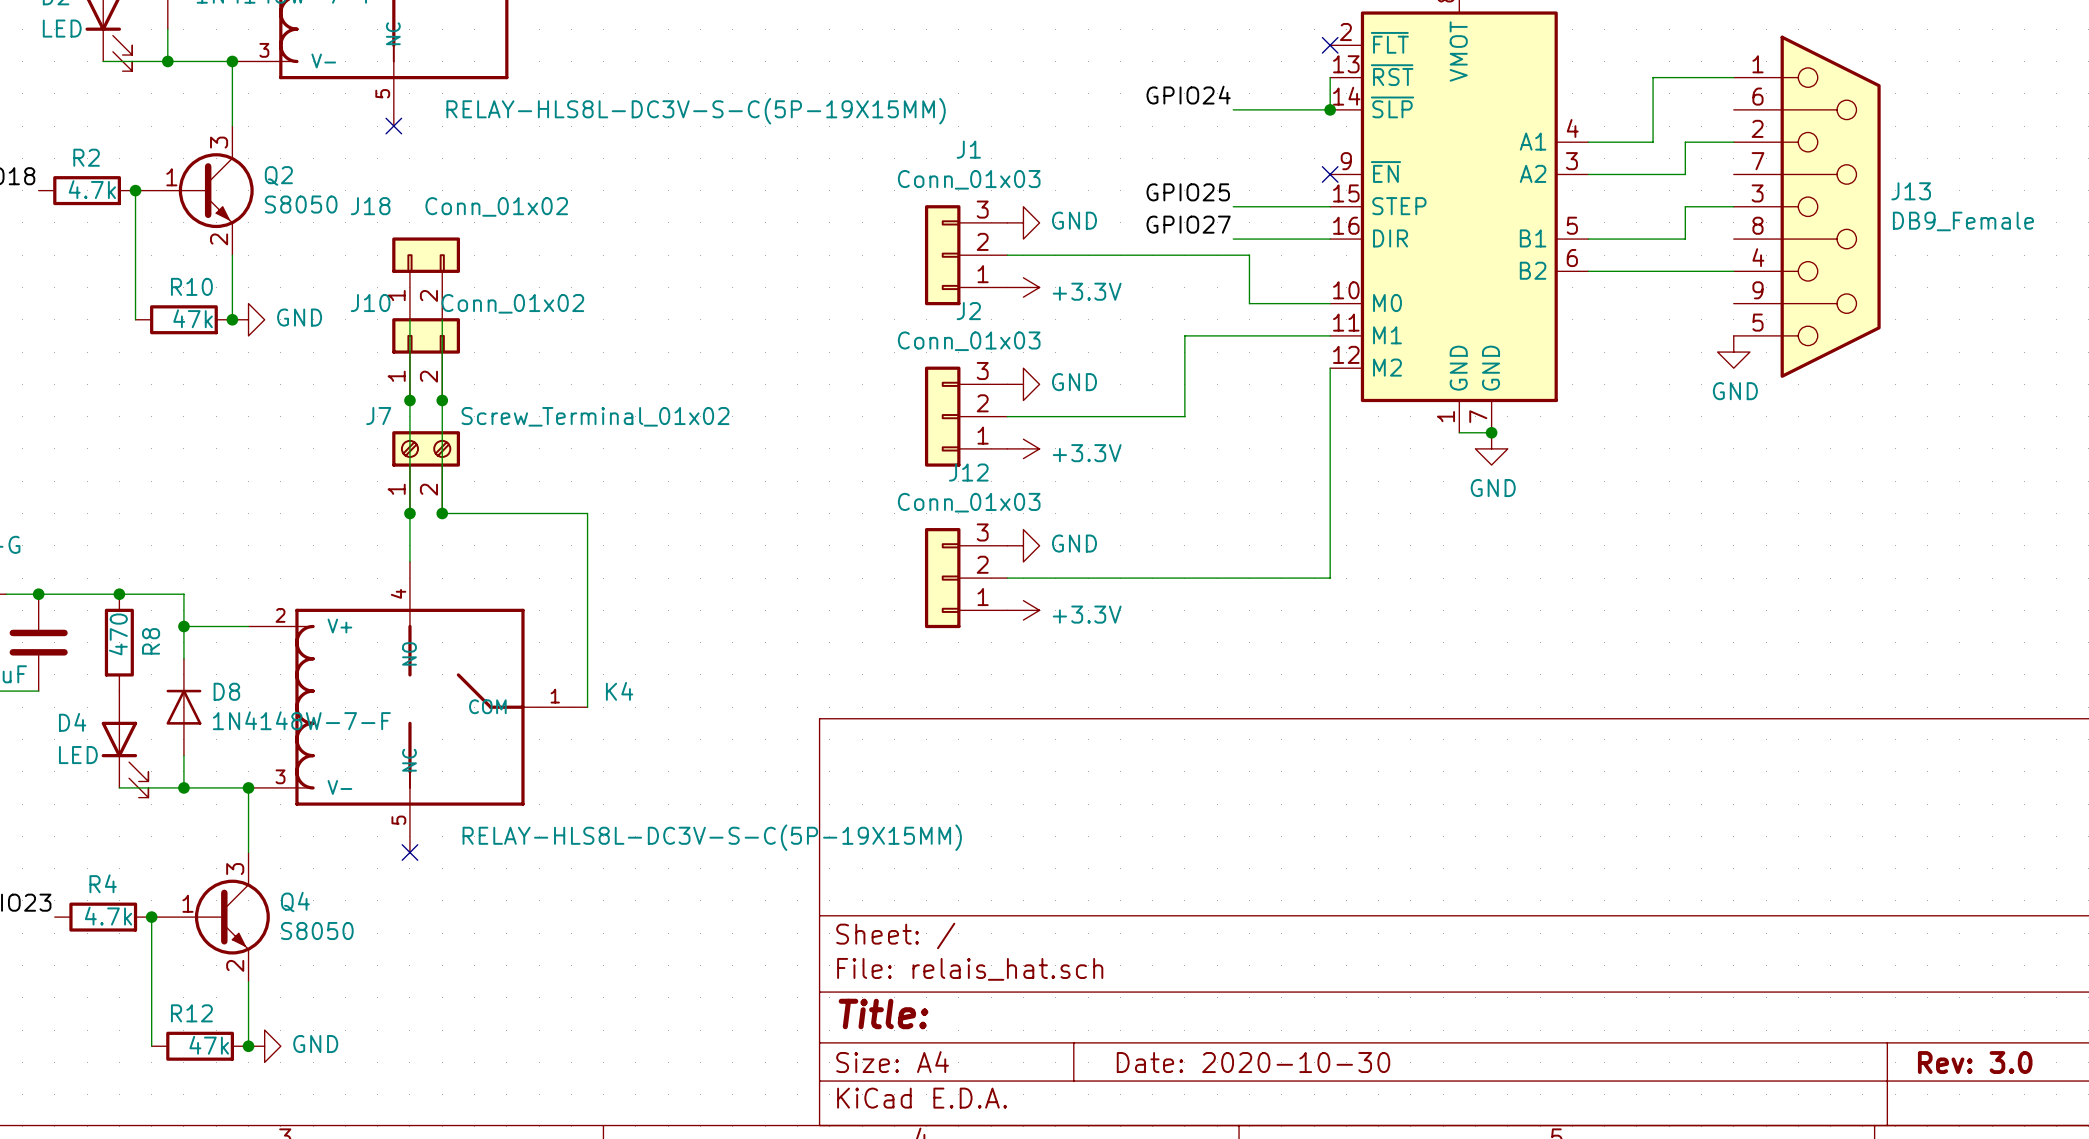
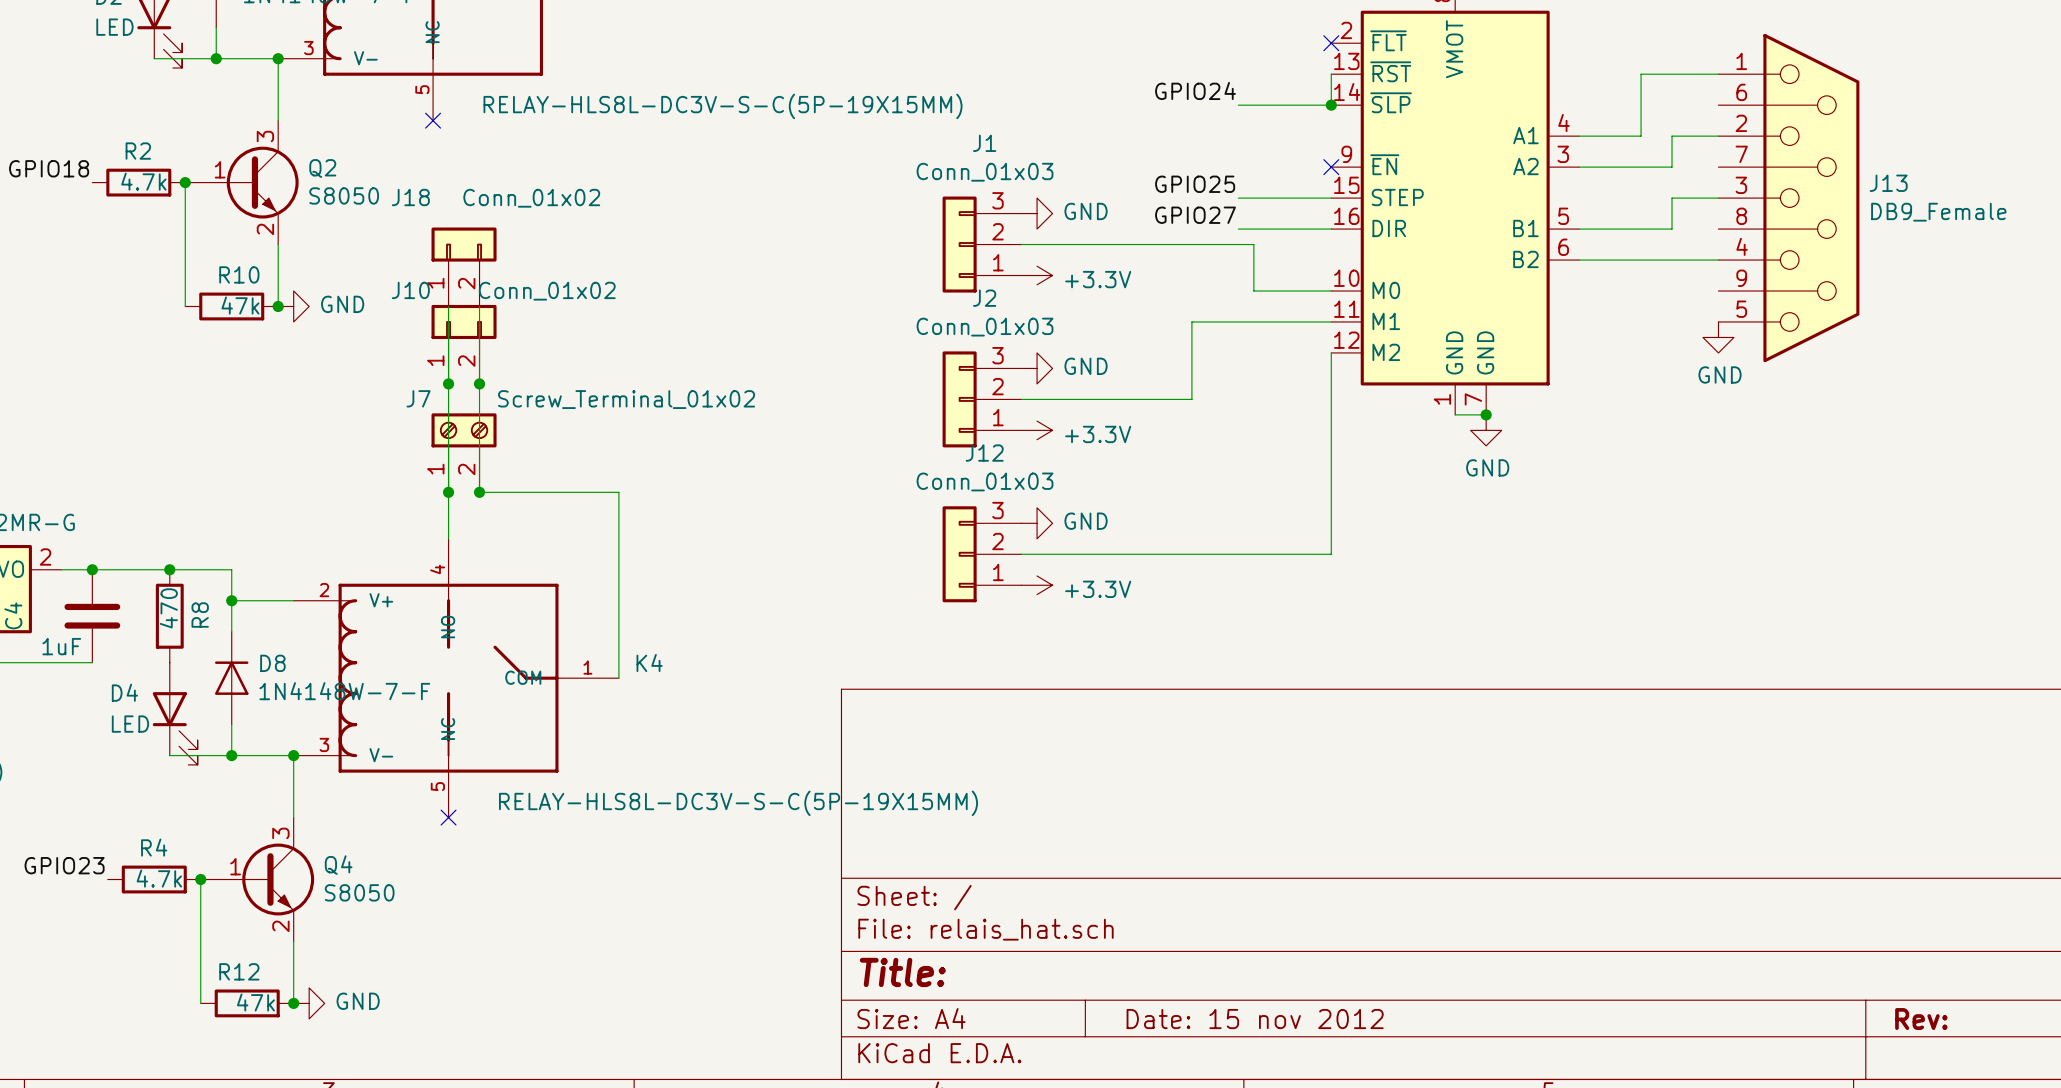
title block: Date: 2020-10-30 (1253, 1062) -> Date: 15 nov 2012 (1255, 1019)
title block: Rev: 3.0 (1975, 1062) -> Rev: (1921, 1019)

